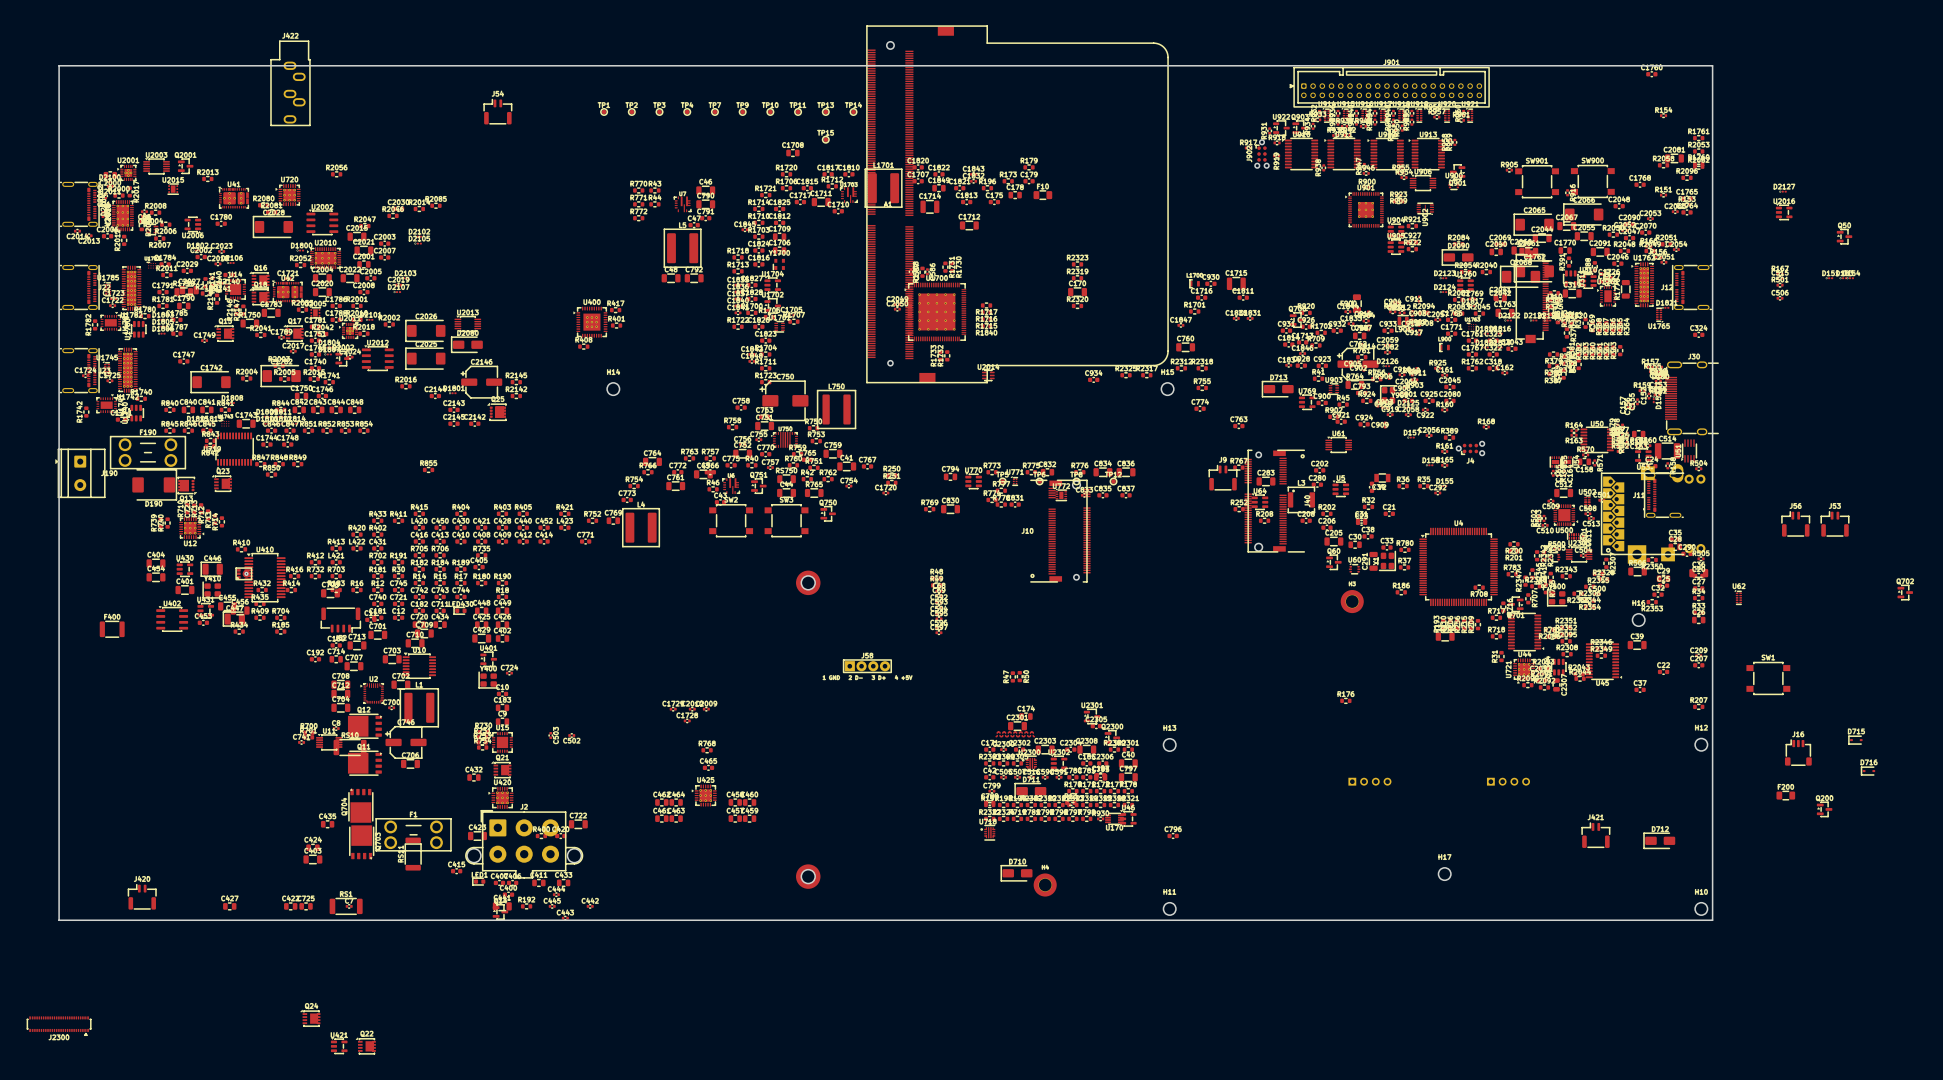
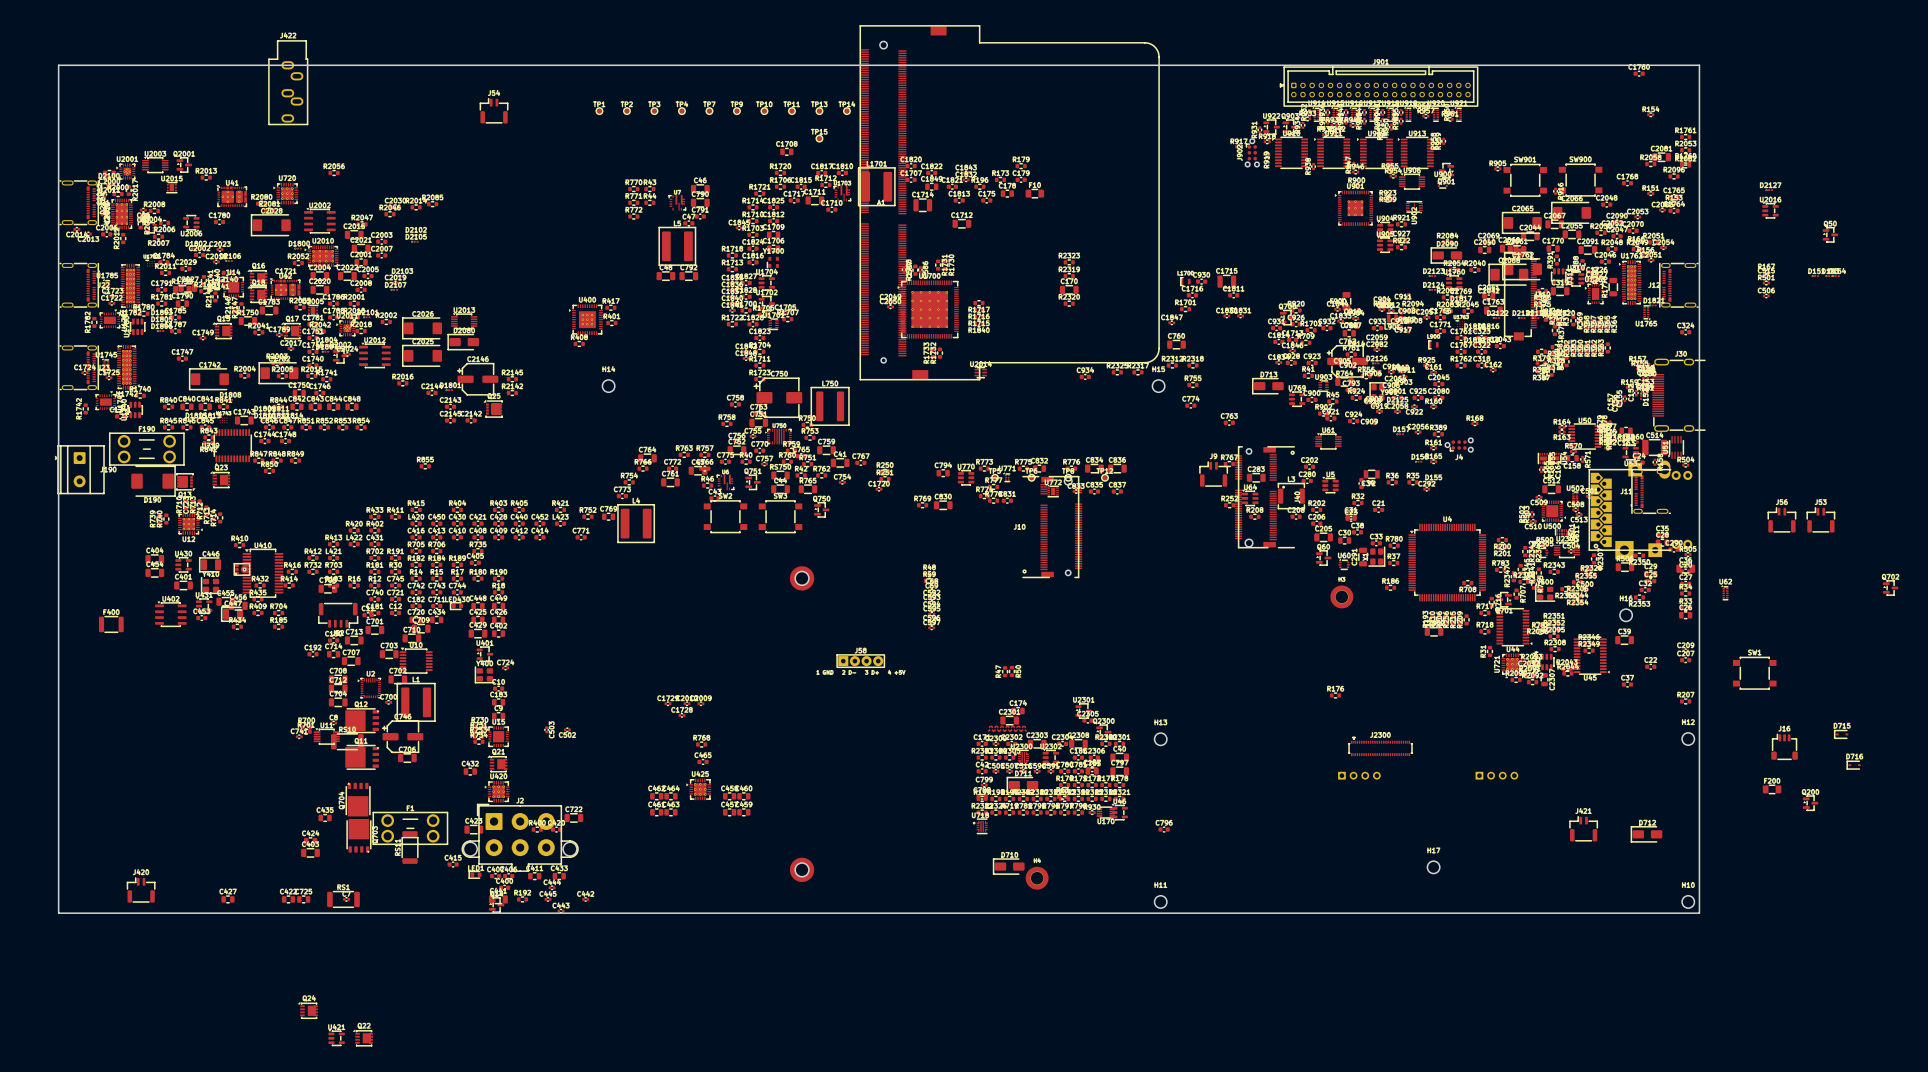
part rotation: 0° (59, 1025) -> 180° (1380, 746)
part position: (59, 1025) -> (1380, 746)

